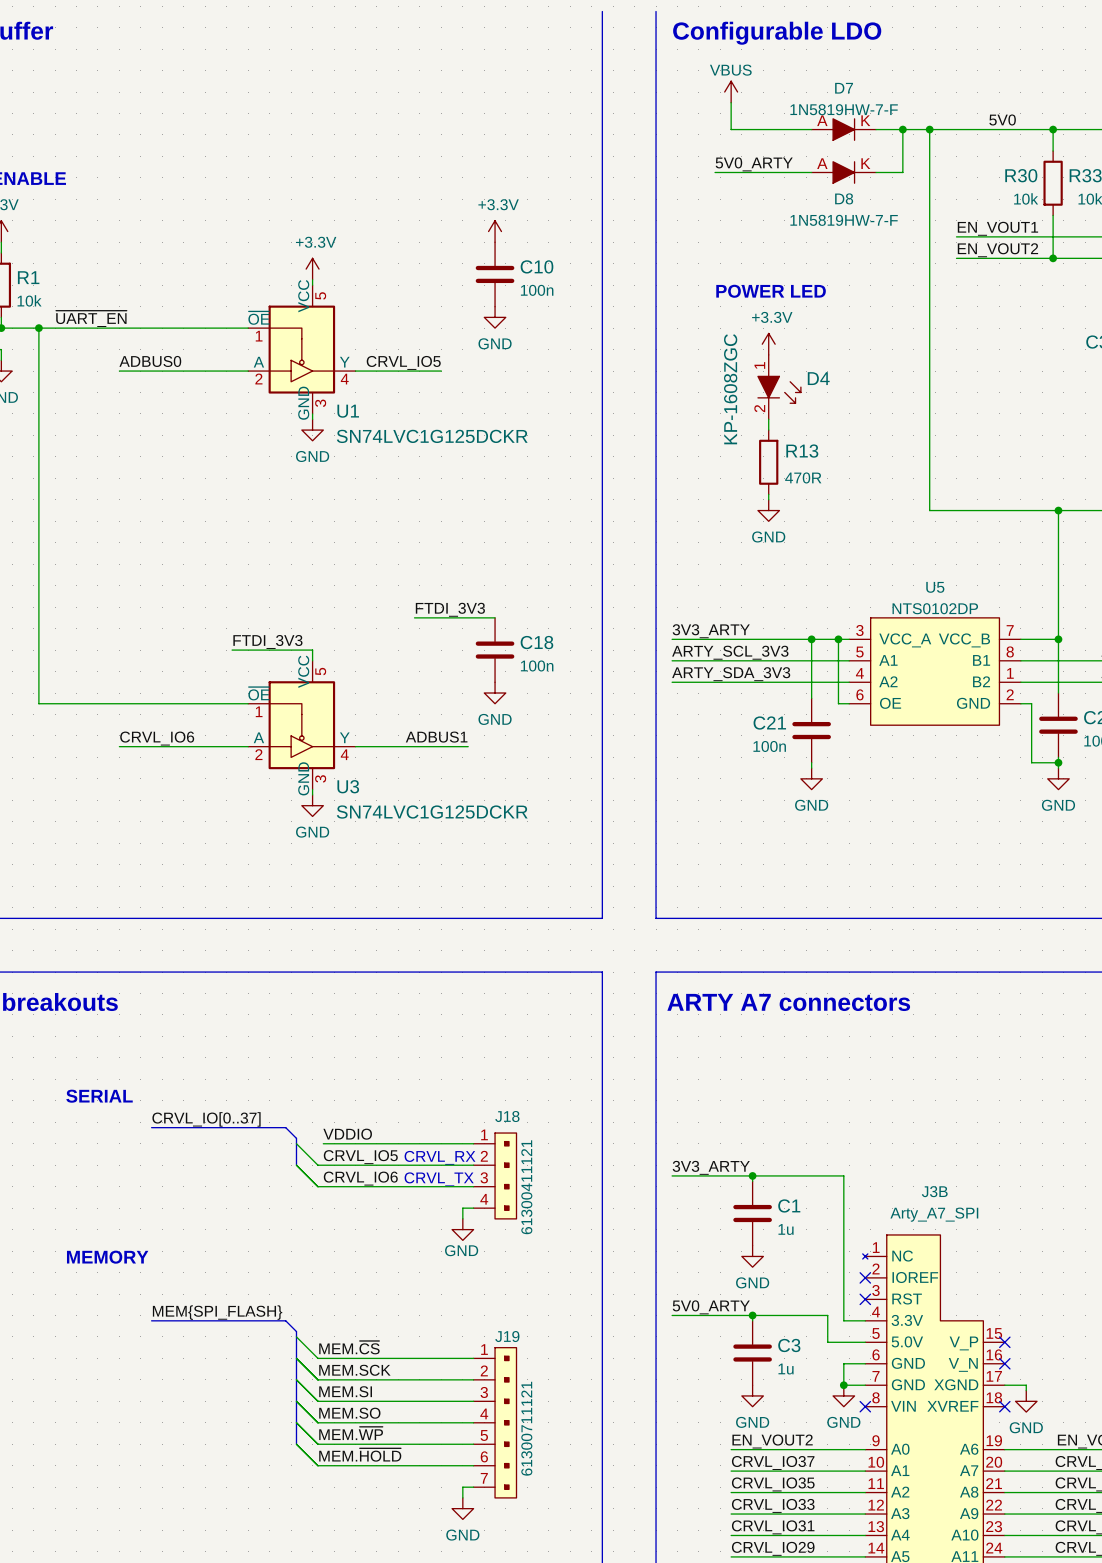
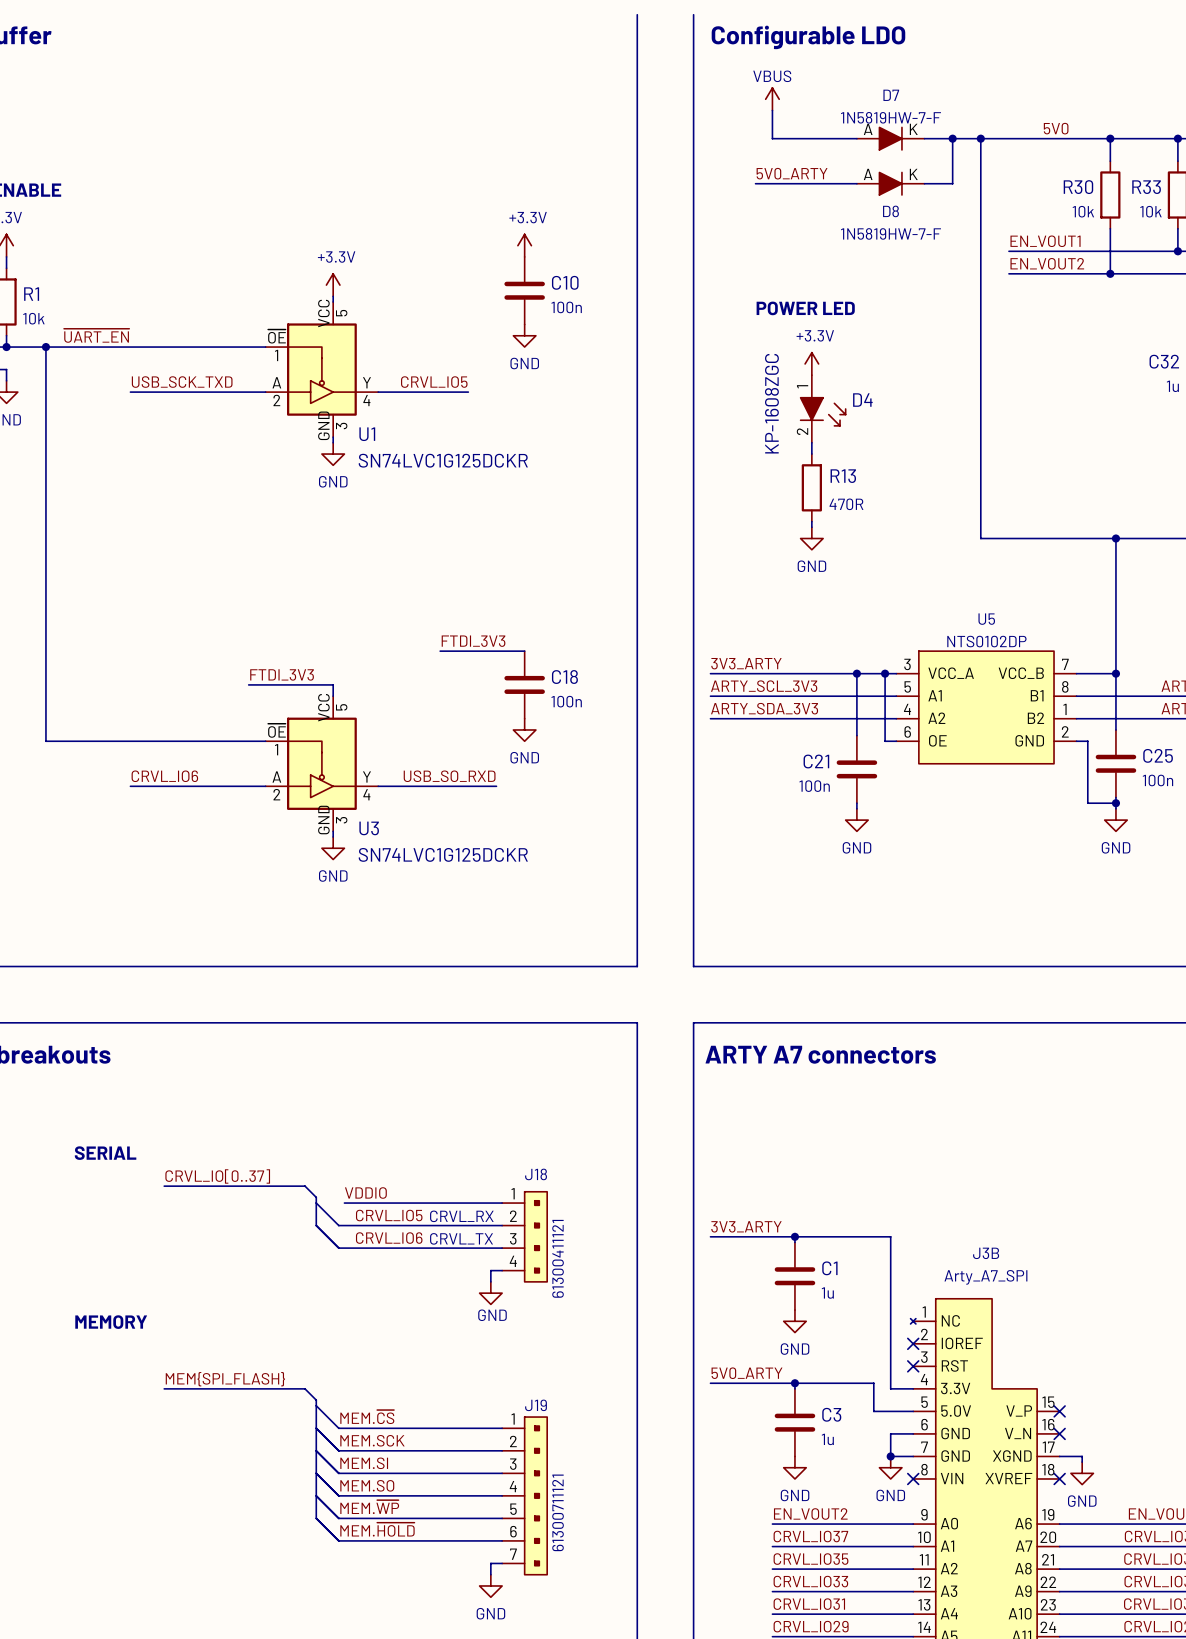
label: ADBUS0 (150, 361) -> USB_SCK_TXD (182, 382)
label: ADBUS1 (436, 737) -> USB_SO_RXD (449, 776)

